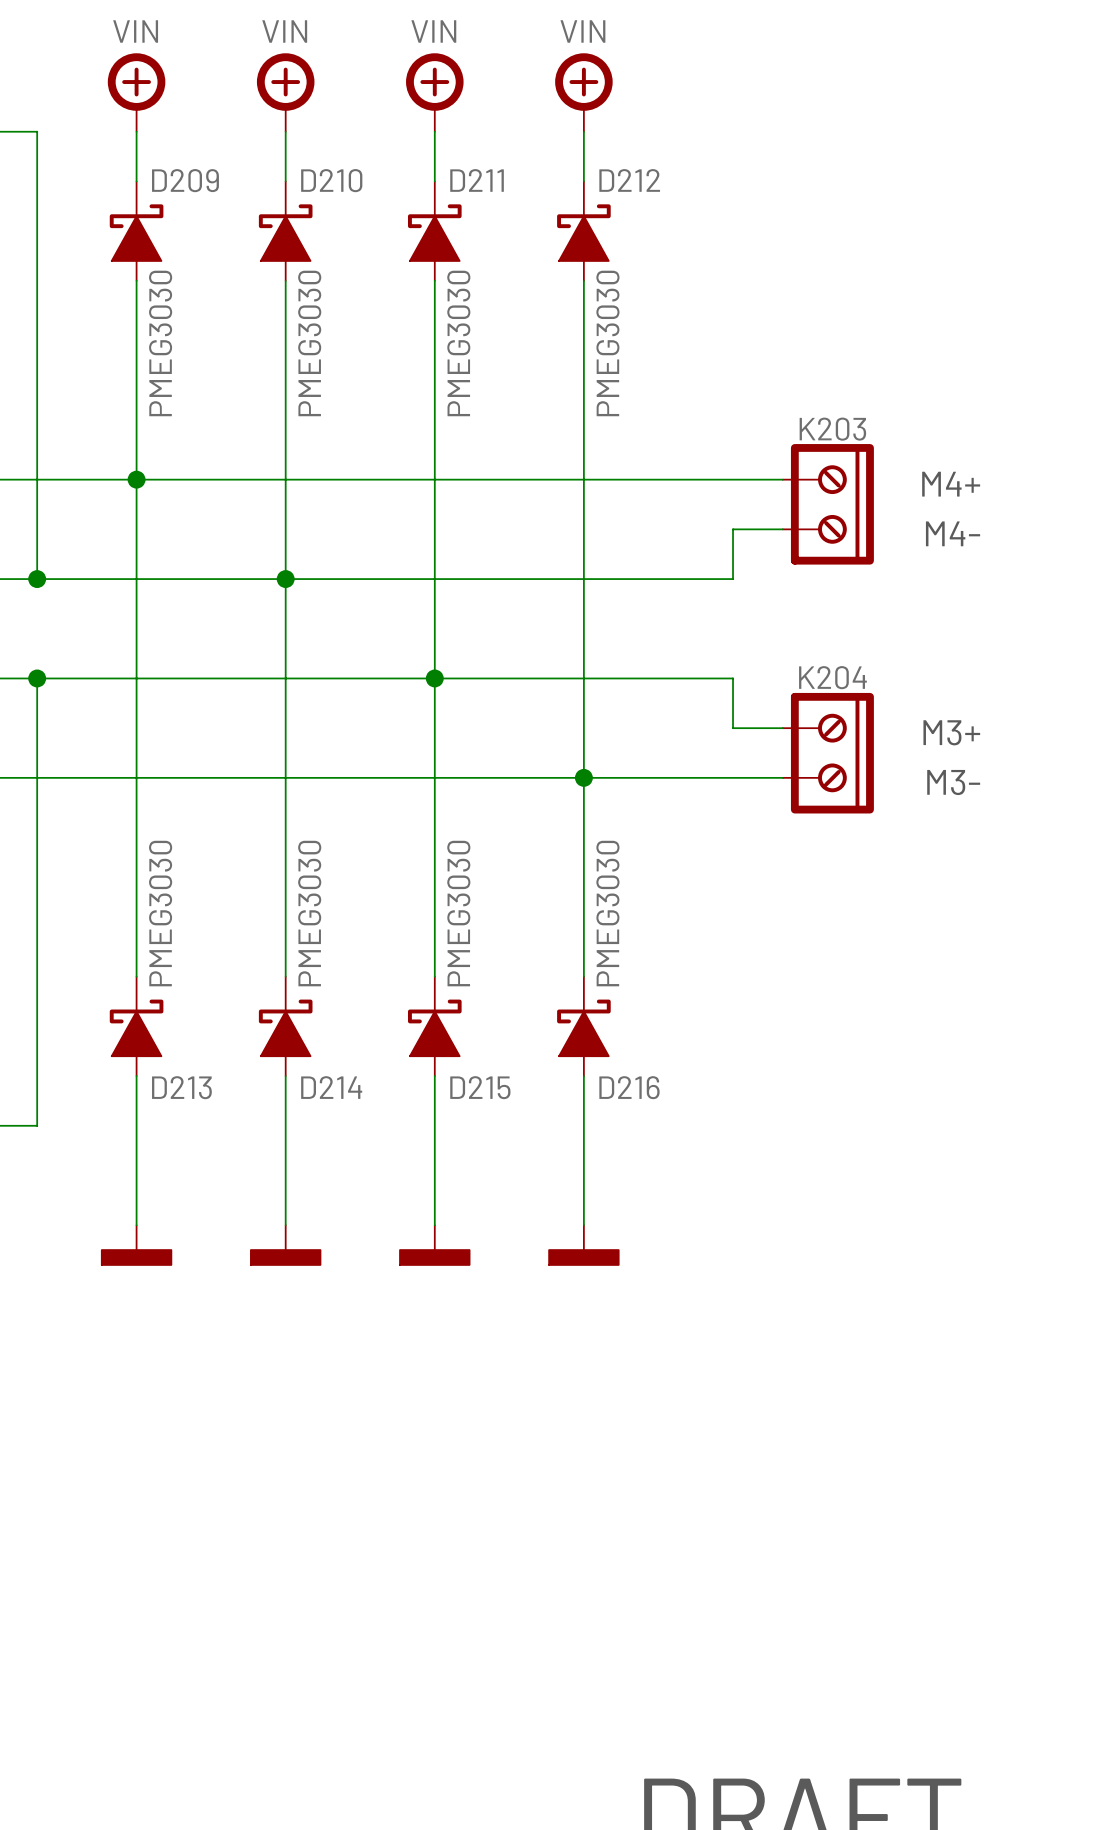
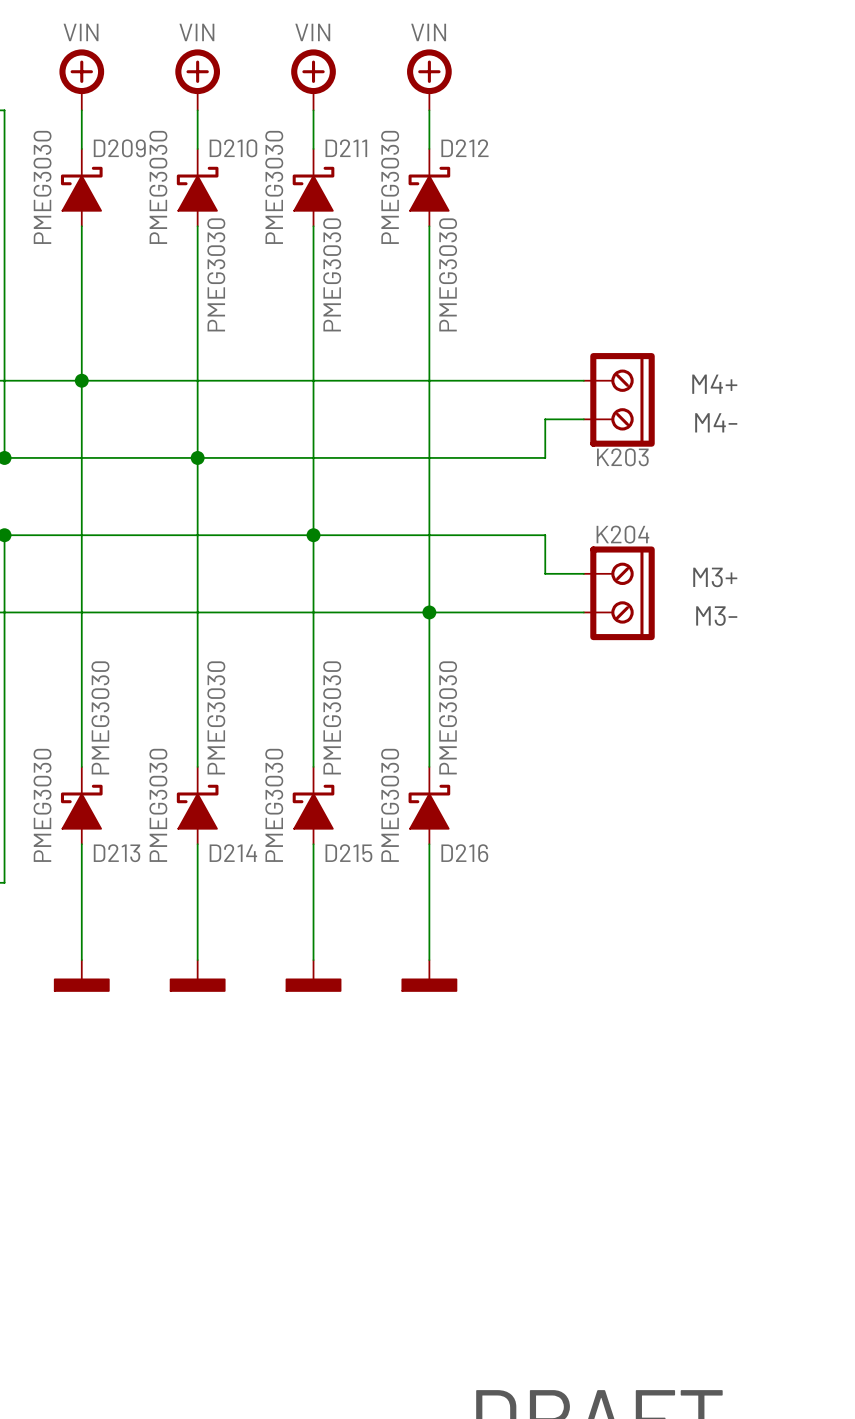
D209 text position: PMEG3030 (160, 343) -> PMEG3030 (42, 187)
D210 text position: PMEG3030 (309, 343) -> PMEG3030 (158, 187)
D211 text position: PMEG3030 (458, 343) -> PMEG3030 (274, 187)
D212 text position: PMEG3030 (607, 343) -> PMEG3030 (390, 187)
K203 name position: K203 (832, 429) -> K203 (622, 457)
D213 text position: PMEG3030 (160, 913) -> PMEG3030 (42, 805)
D214 text position: PMEG3030 (309, 913) -> PMEG3030 (158, 805)
D215 text position: PMEG3030 (458, 913) -> PMEG3030 (274, 805)
D216 text position: PMEG3030 (607, 913) -> PMEG3030 (390, 805)

